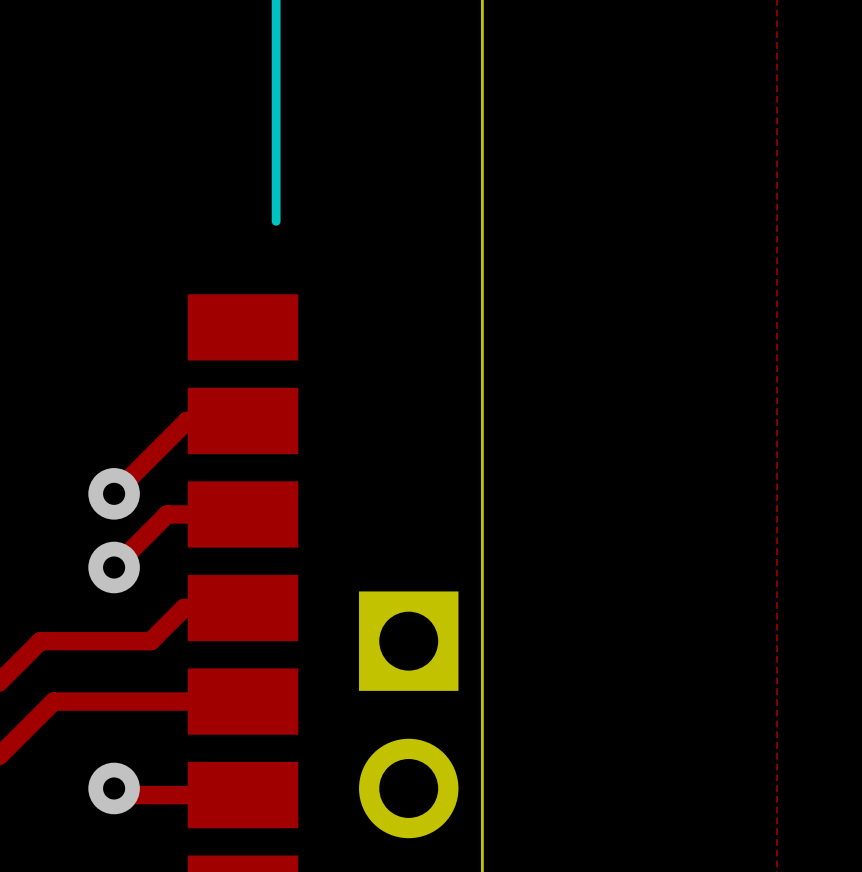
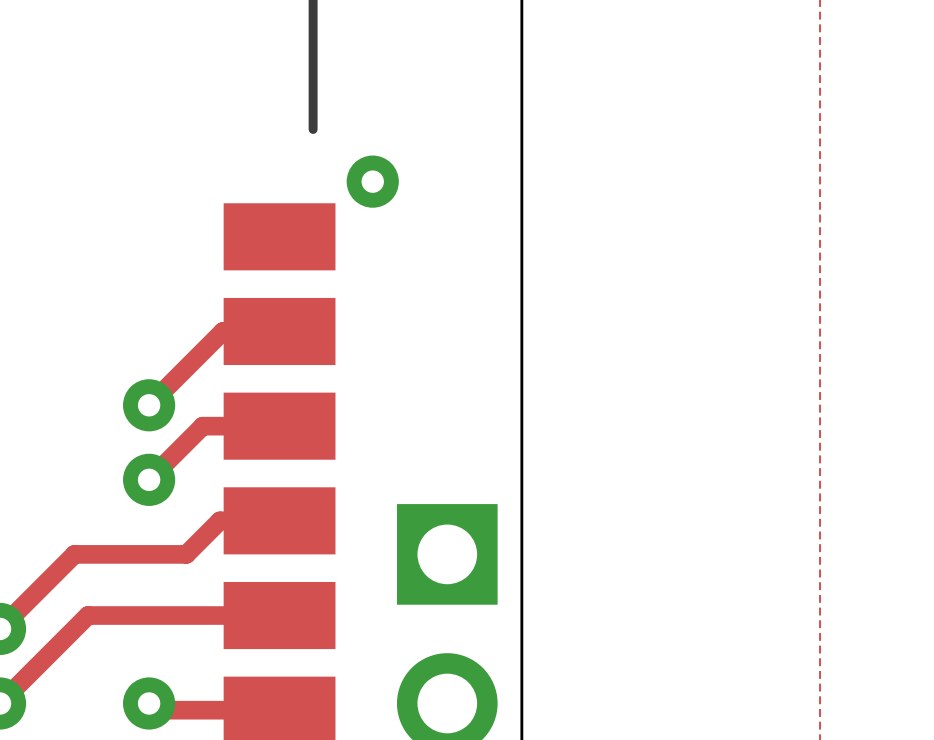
via: none -> (372, 181)

